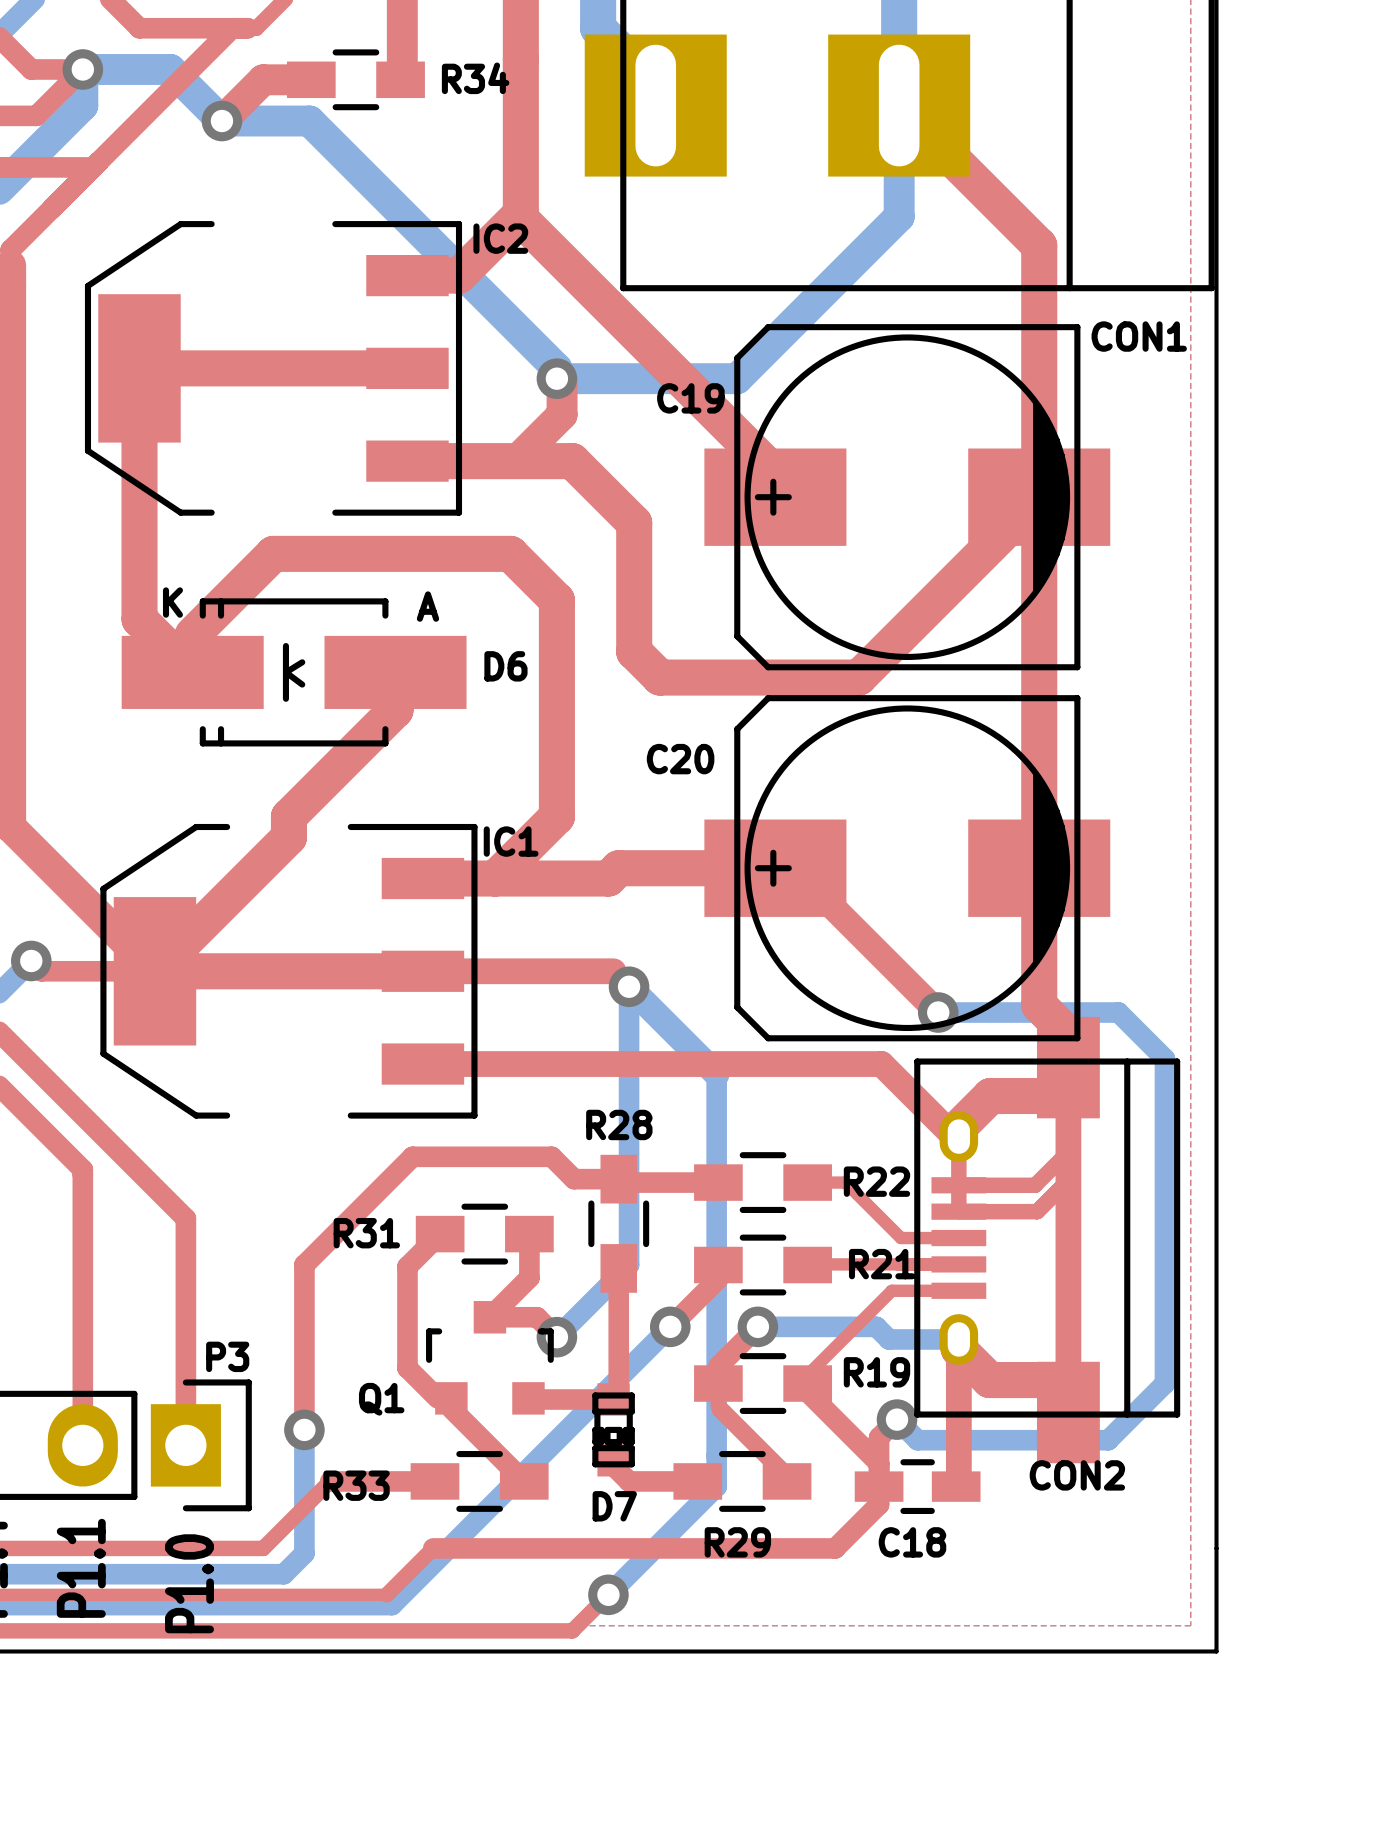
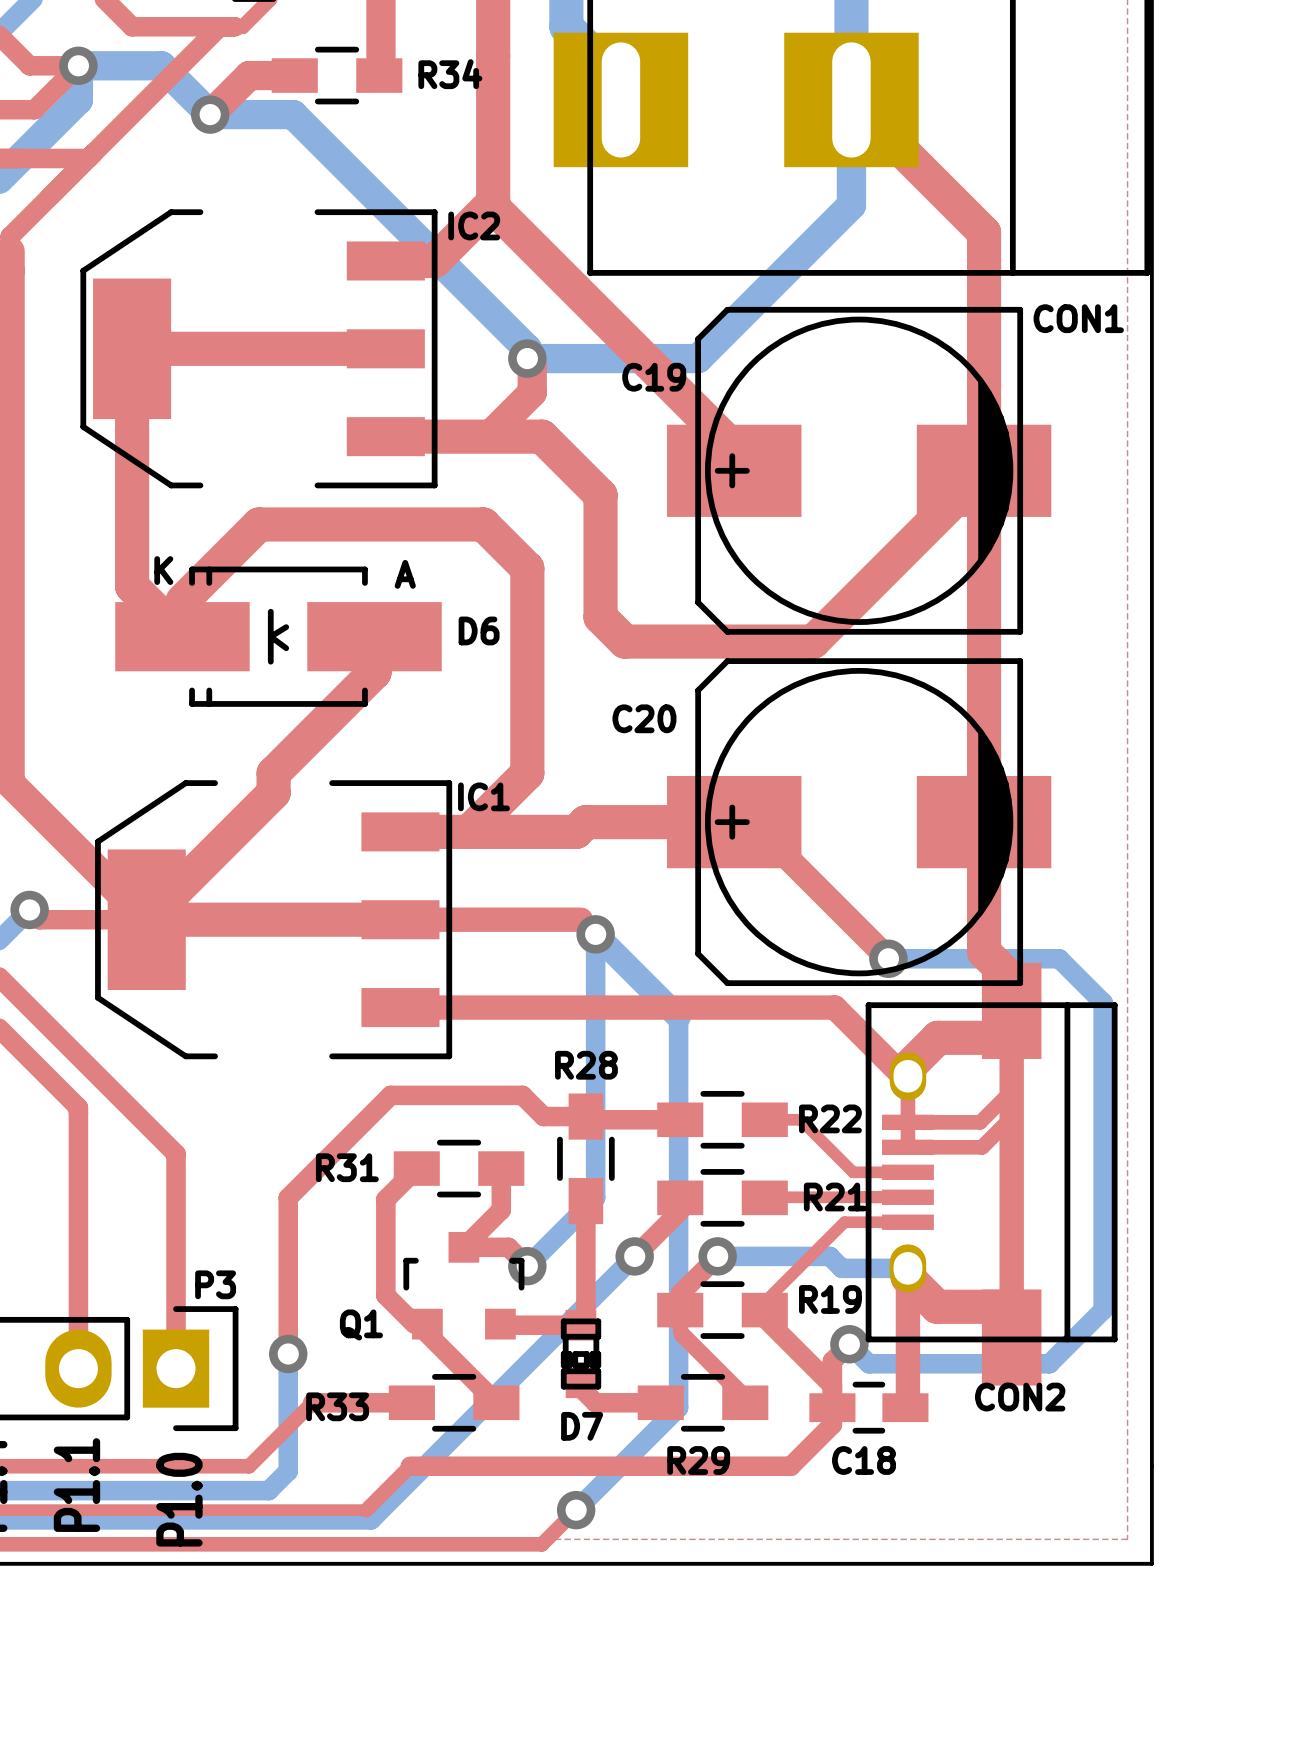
CON2 footprint: [914, 1016, 1181, 1464] -> [865, 962, 1118, 1386]

